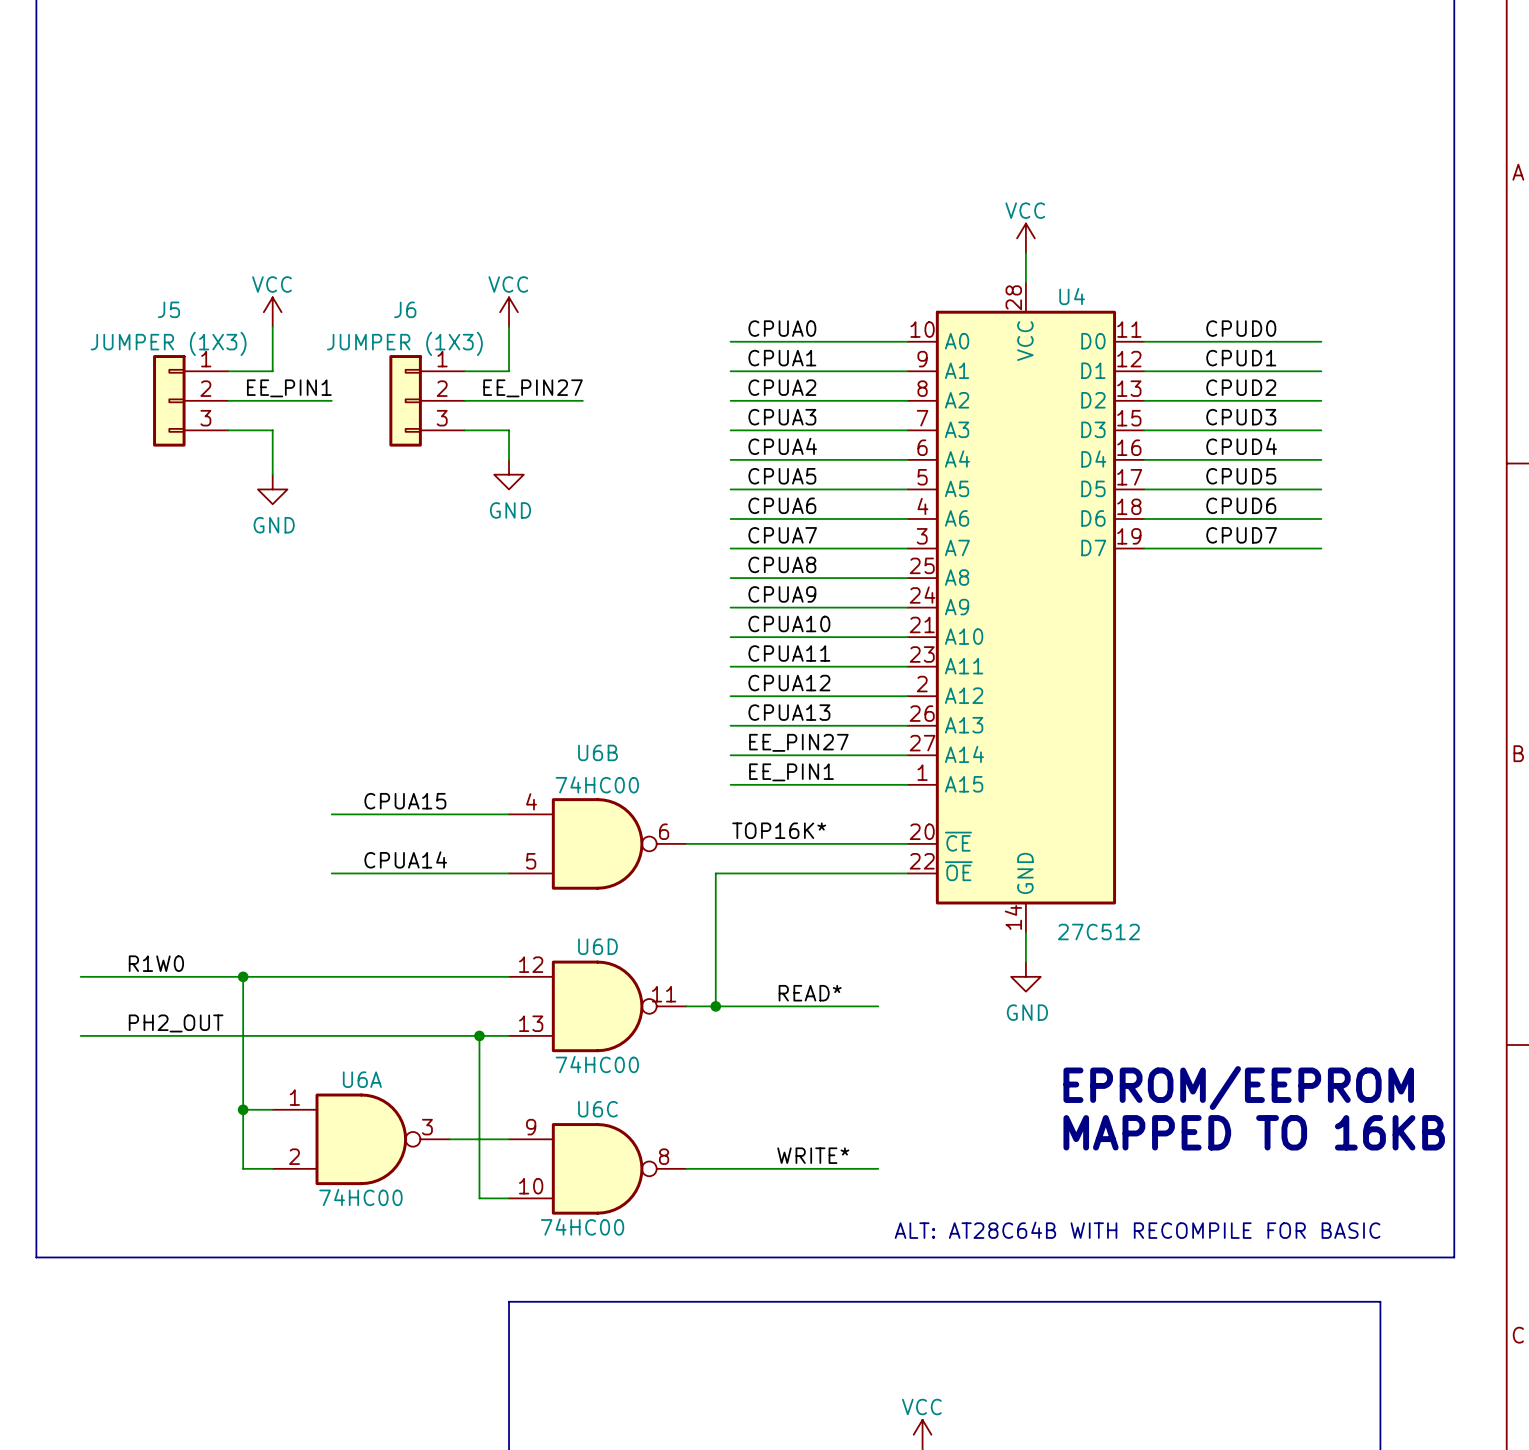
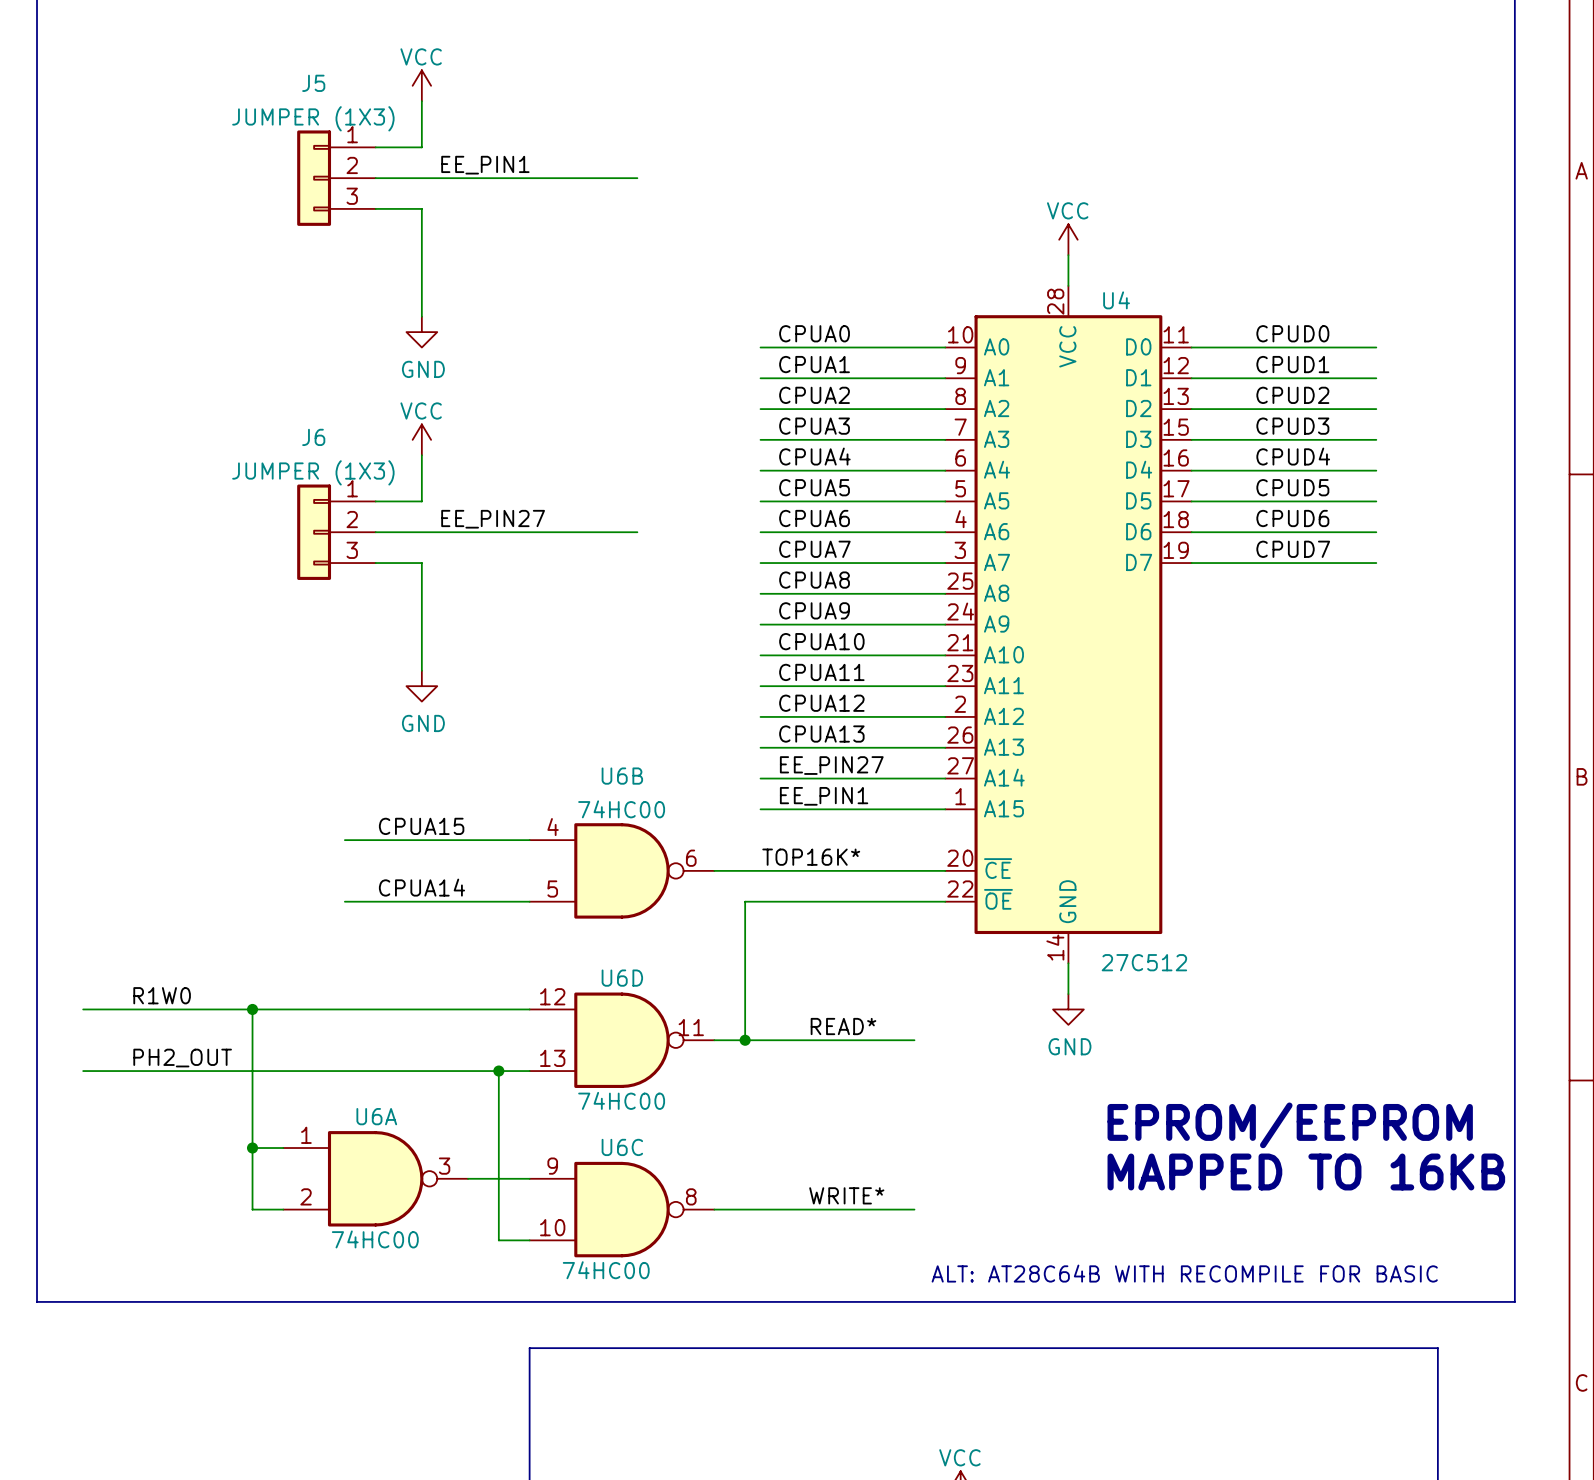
power symbol: none -> VCC (421, 85)
wire: none -> (375, 178) (637, 178)
wire: none -> (375, 208) (421, 208) (421, 316)
power symbol: VCC (272, 312) -> none
power symbol: VCC (509, 312) -> none
wire: (272, 326) (272, 371) (228, 371) -> (421, 101) (421, 147) (375, 147)
power symbol: none -> GND (421, 332)
wire: (509, 326) (509, 371) (464, 371) -> (421, 455) (421, 501) (375, 501)
label position: EE_PIN1 (289, 388) -> EE_PIN1 (485, 165)
label position: EE_PIN27 (533, 388) -> EE_PIN27 (493, 519)
J5 position: (190, 400) -> (336, 178)
wire: (228, 400) (331, 400) -> none
J6 position: (427, 400) -> (336, 532)
wire: (464, 400) (582, 400) -> none
wire: (228, 430) (272, 430) (272, 474) -> none
power symbol: none -> VCC (421, 439)
wire: (464, 430) (509, 430) (509, 459) -> none
power symbol: GND (509, 474) -> none
power symbol: GND (272, 489) -> none
wire: none -> (375, 532) (637, 532)
wire: none -> (375, 563) (421, 563) (421, 670)
power symbol: none -> GND (421, 686)

